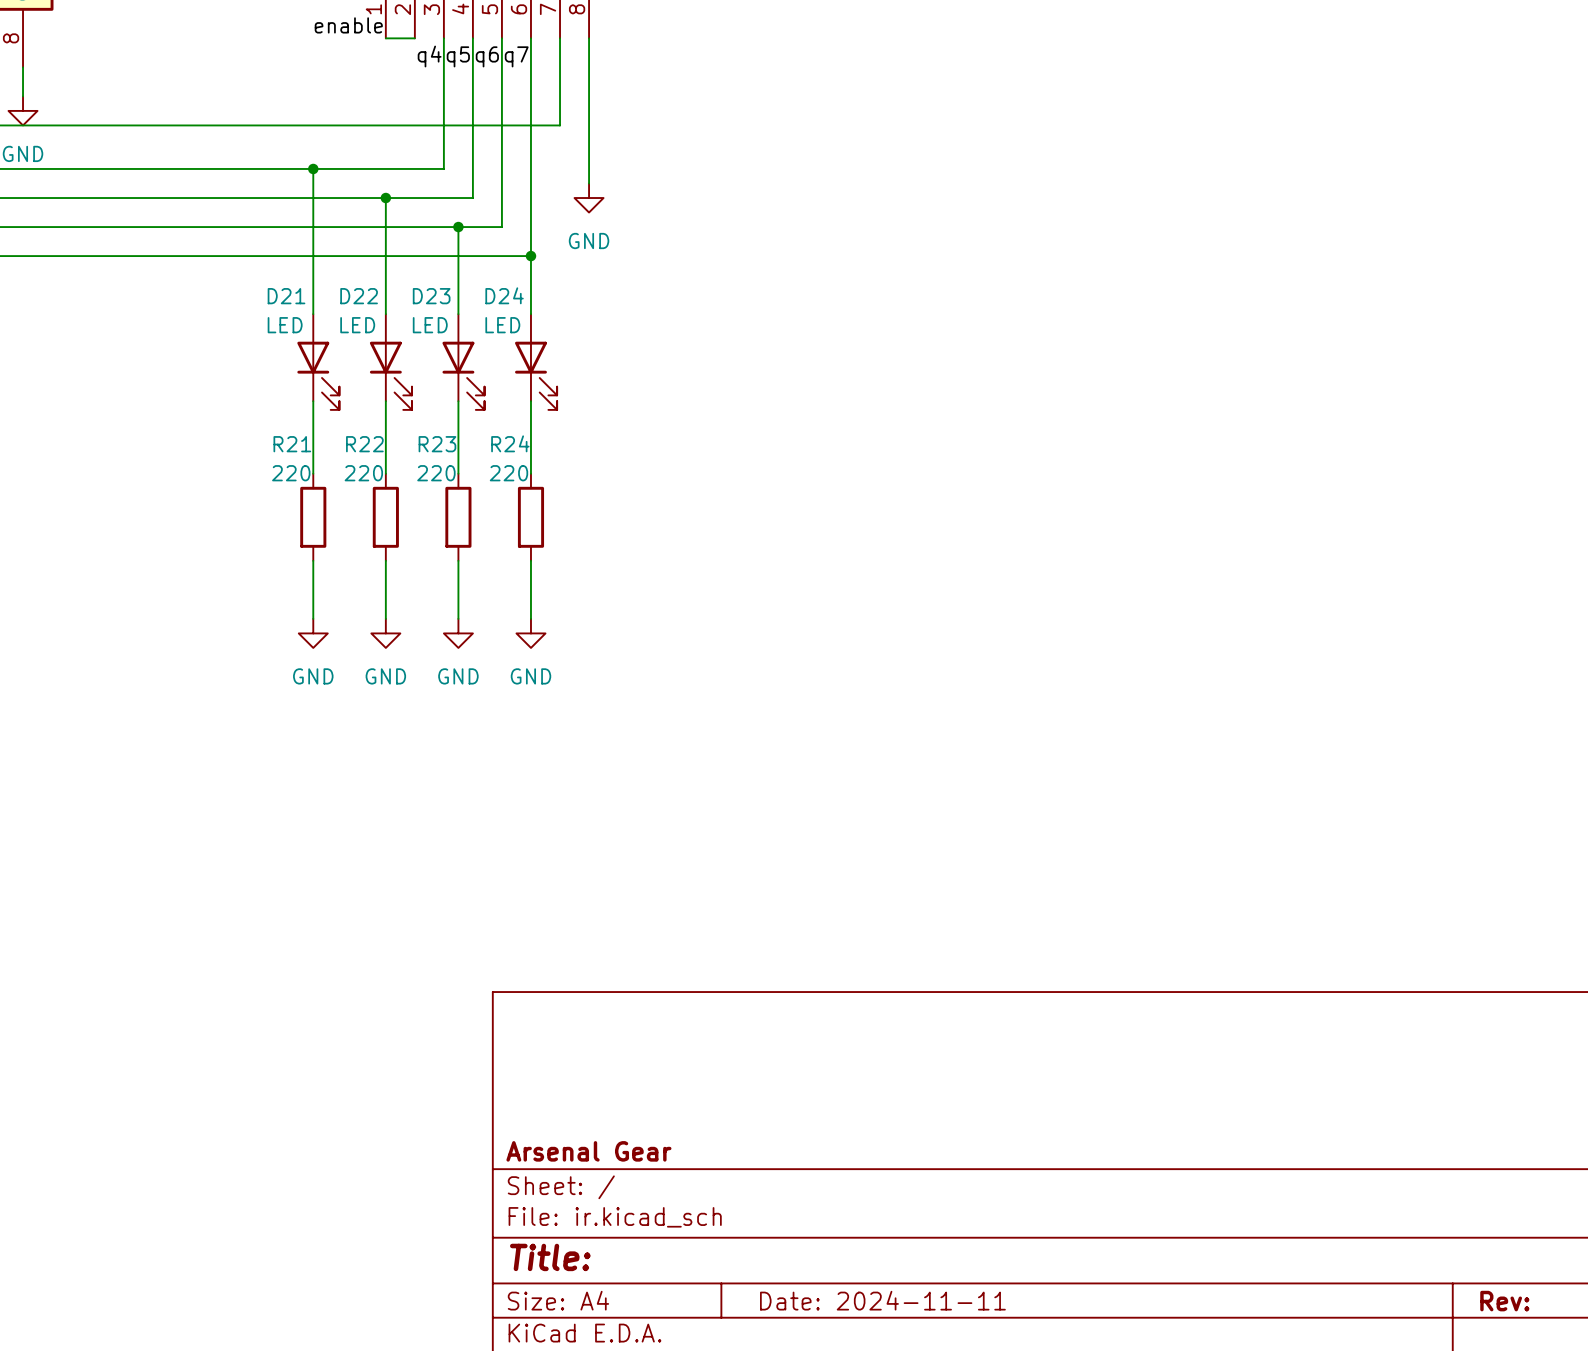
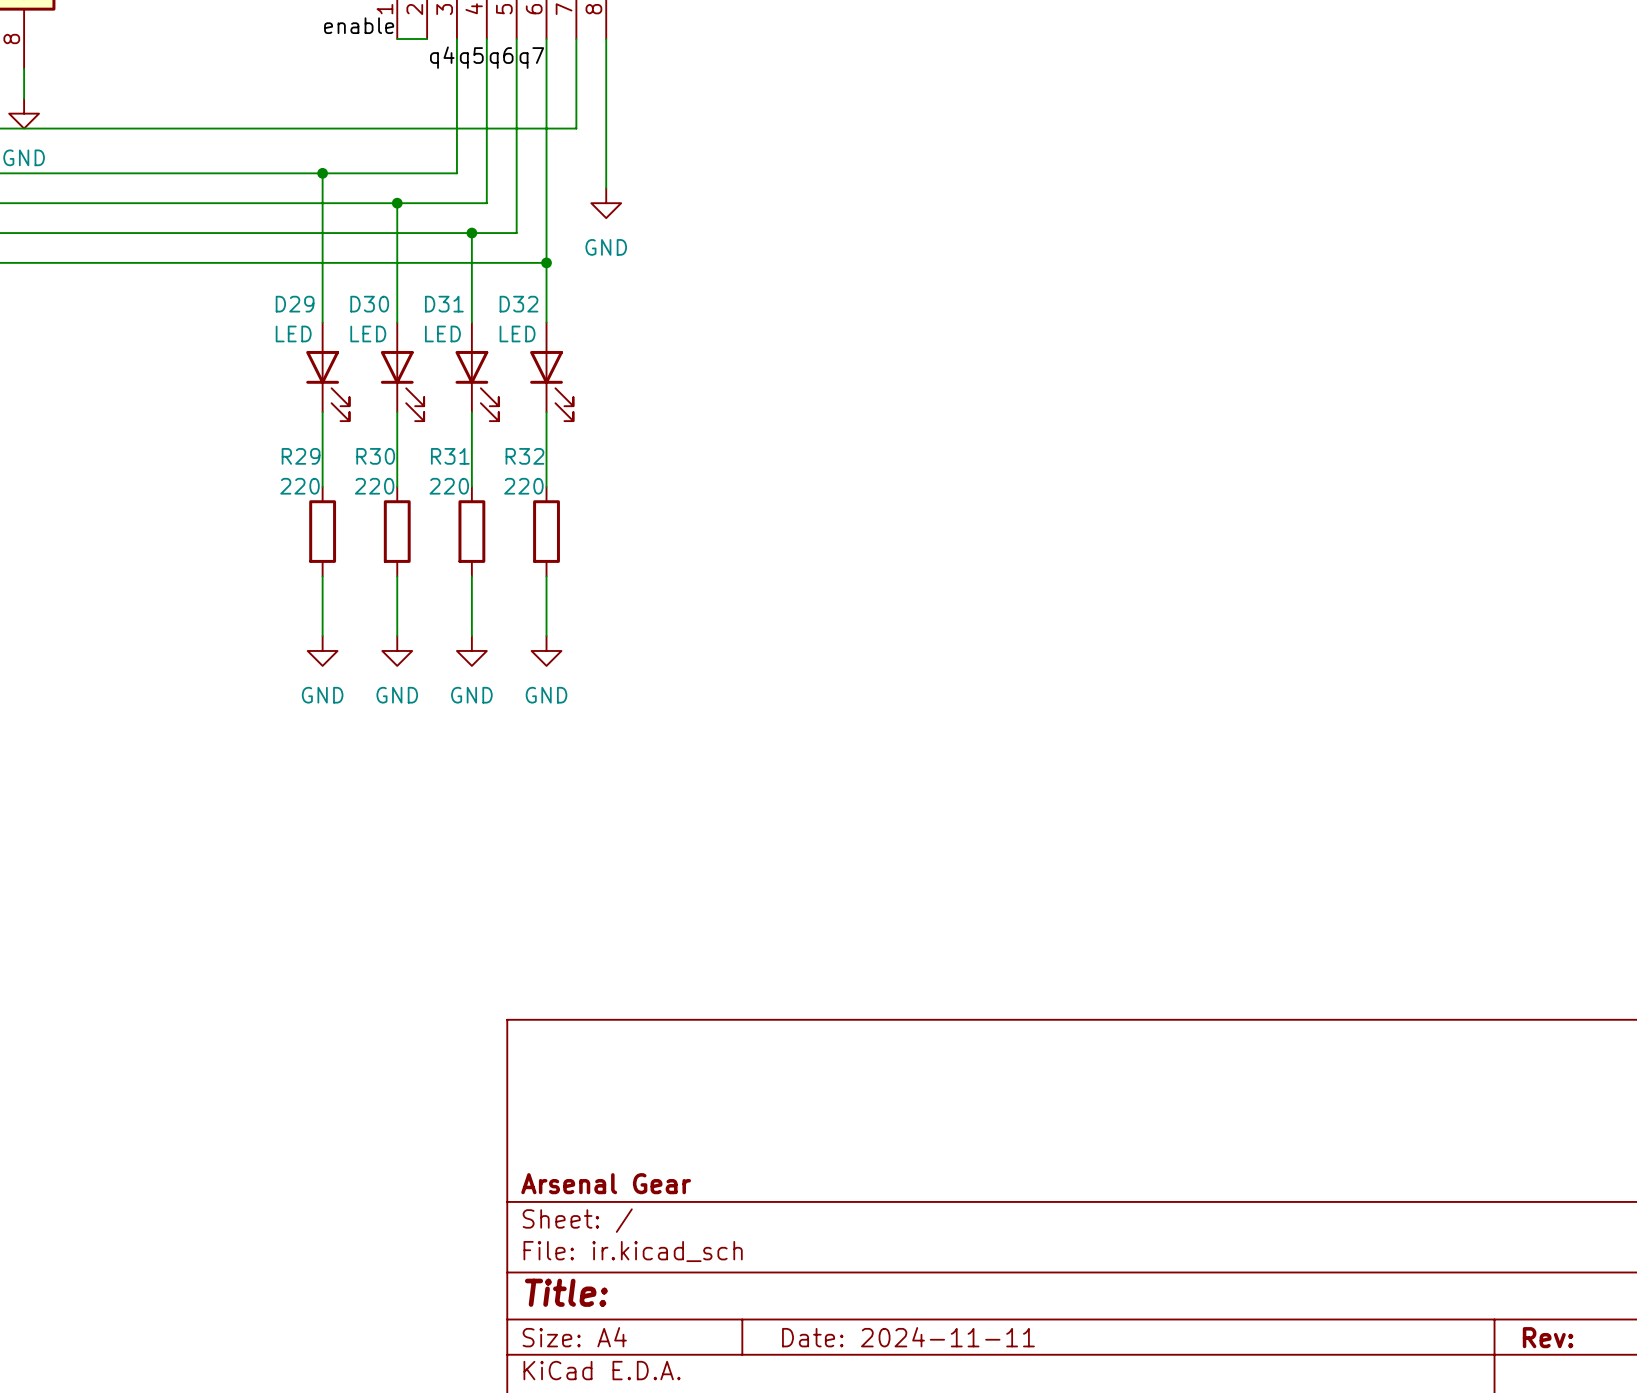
D24 name: D24 (504, 295) -> D32 (518, 304)
D21 name: D21 (286, 296) -> D29 (295, 304)
D22 name: D22 (359, 296) -> D30 (369, 304)
D23 name: D23 (431, 296) -> D31 (444, 304)
R24 name: R24 (510, 443) -> R32 (524, 456)
R21 name: R21 (292, 444) -> R29 (301, 456)
R22 name: R22 (364, 444) -> R30 (375, 456)
R23 name: R23 (437, 444) -> R31 (450, 456)

